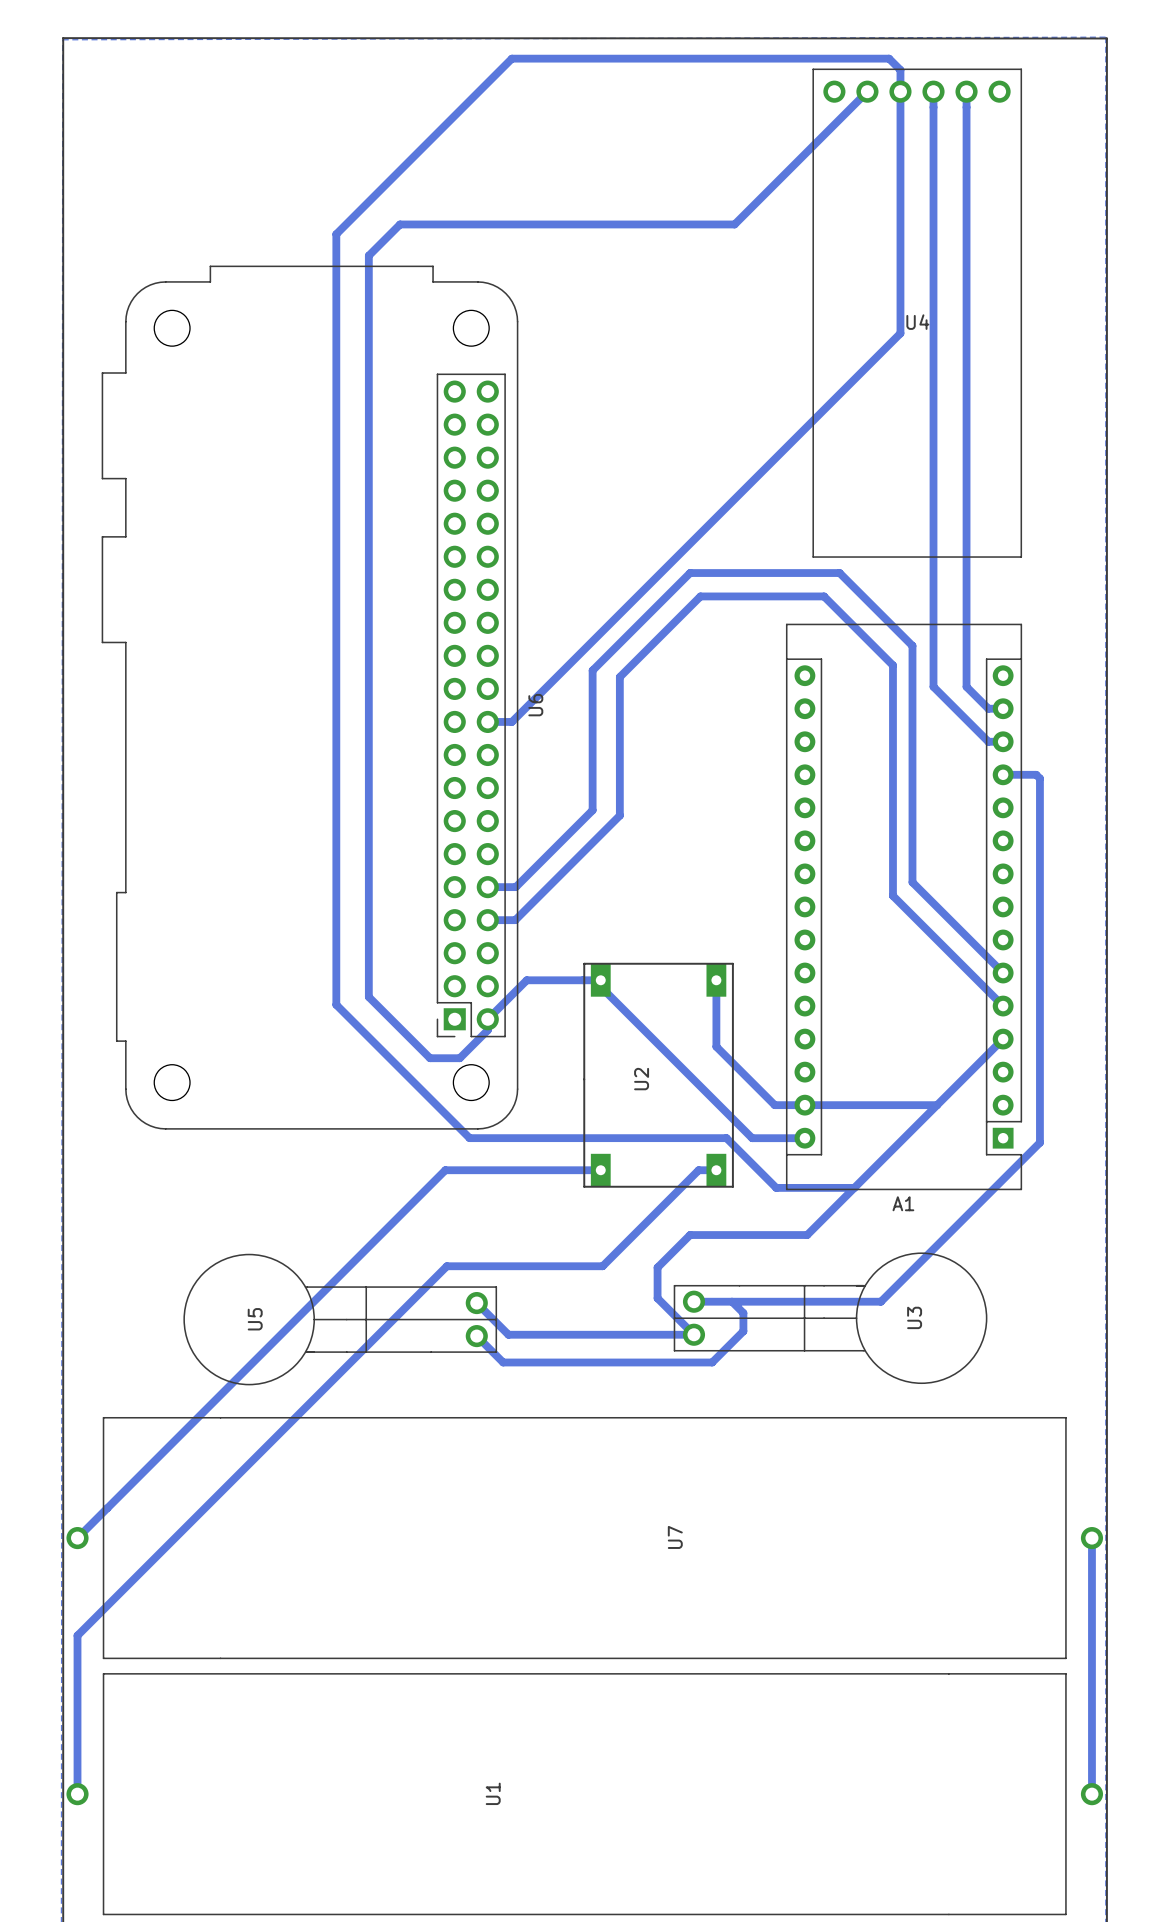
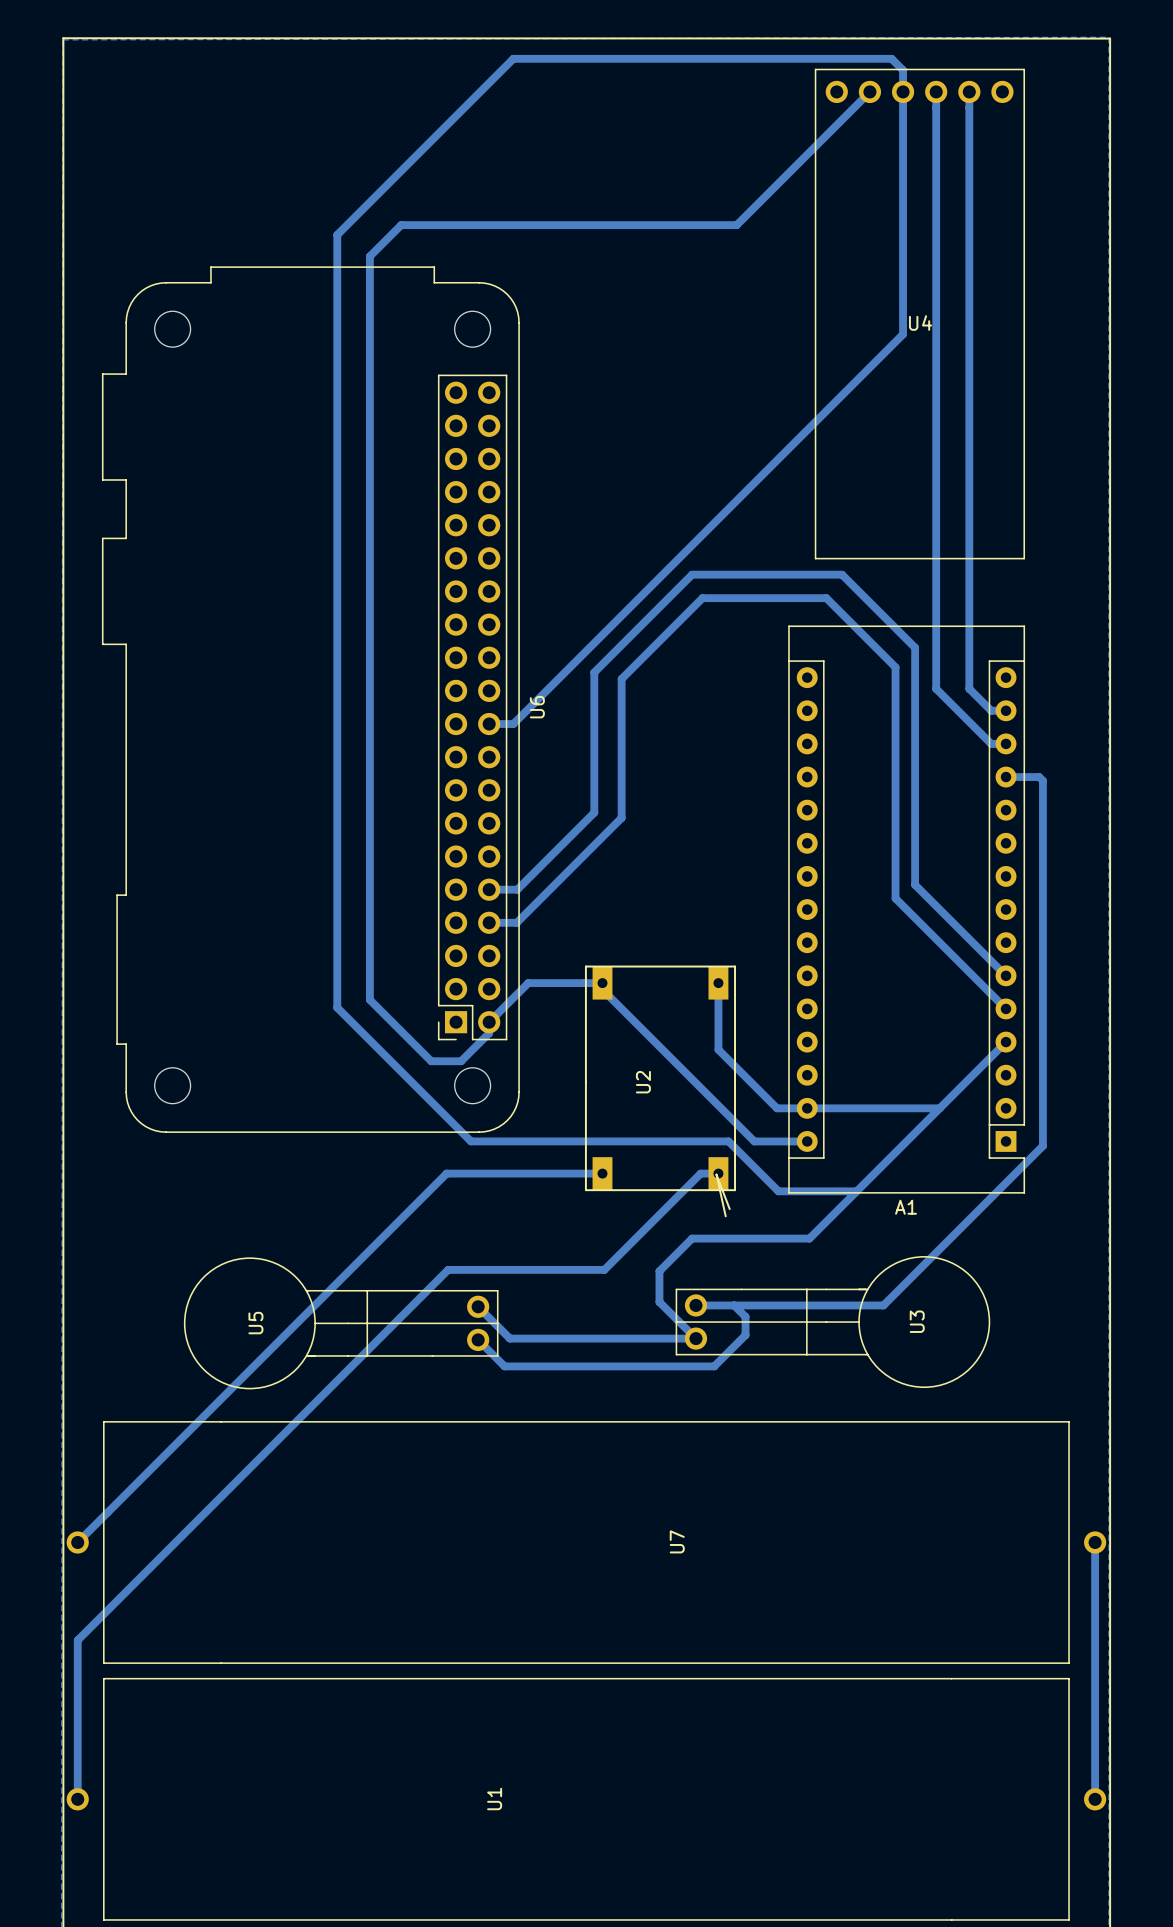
line: none -> (729, 1209) (716, 1174) (725, 1216)

